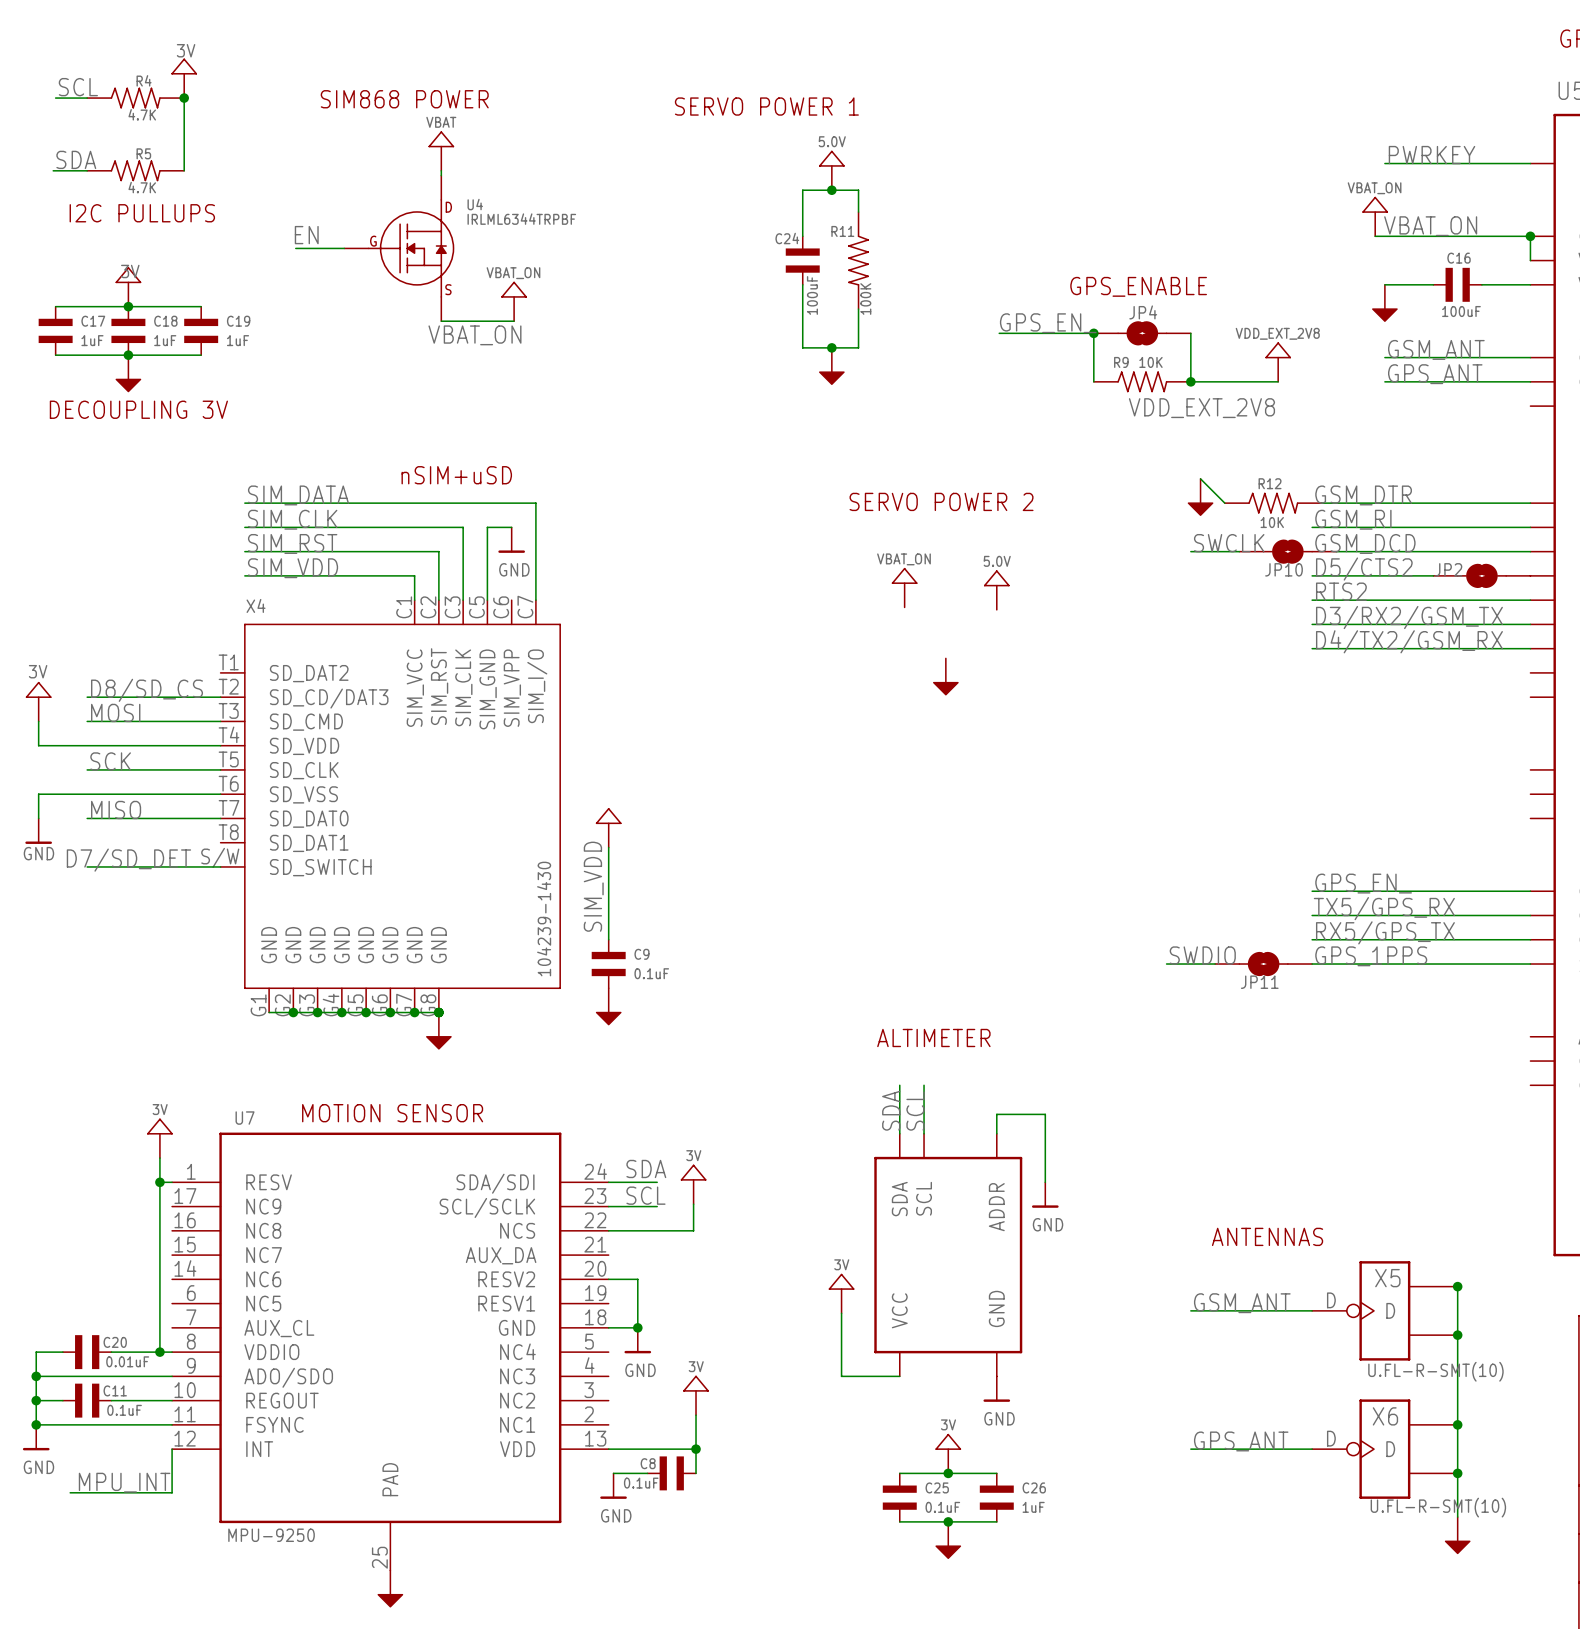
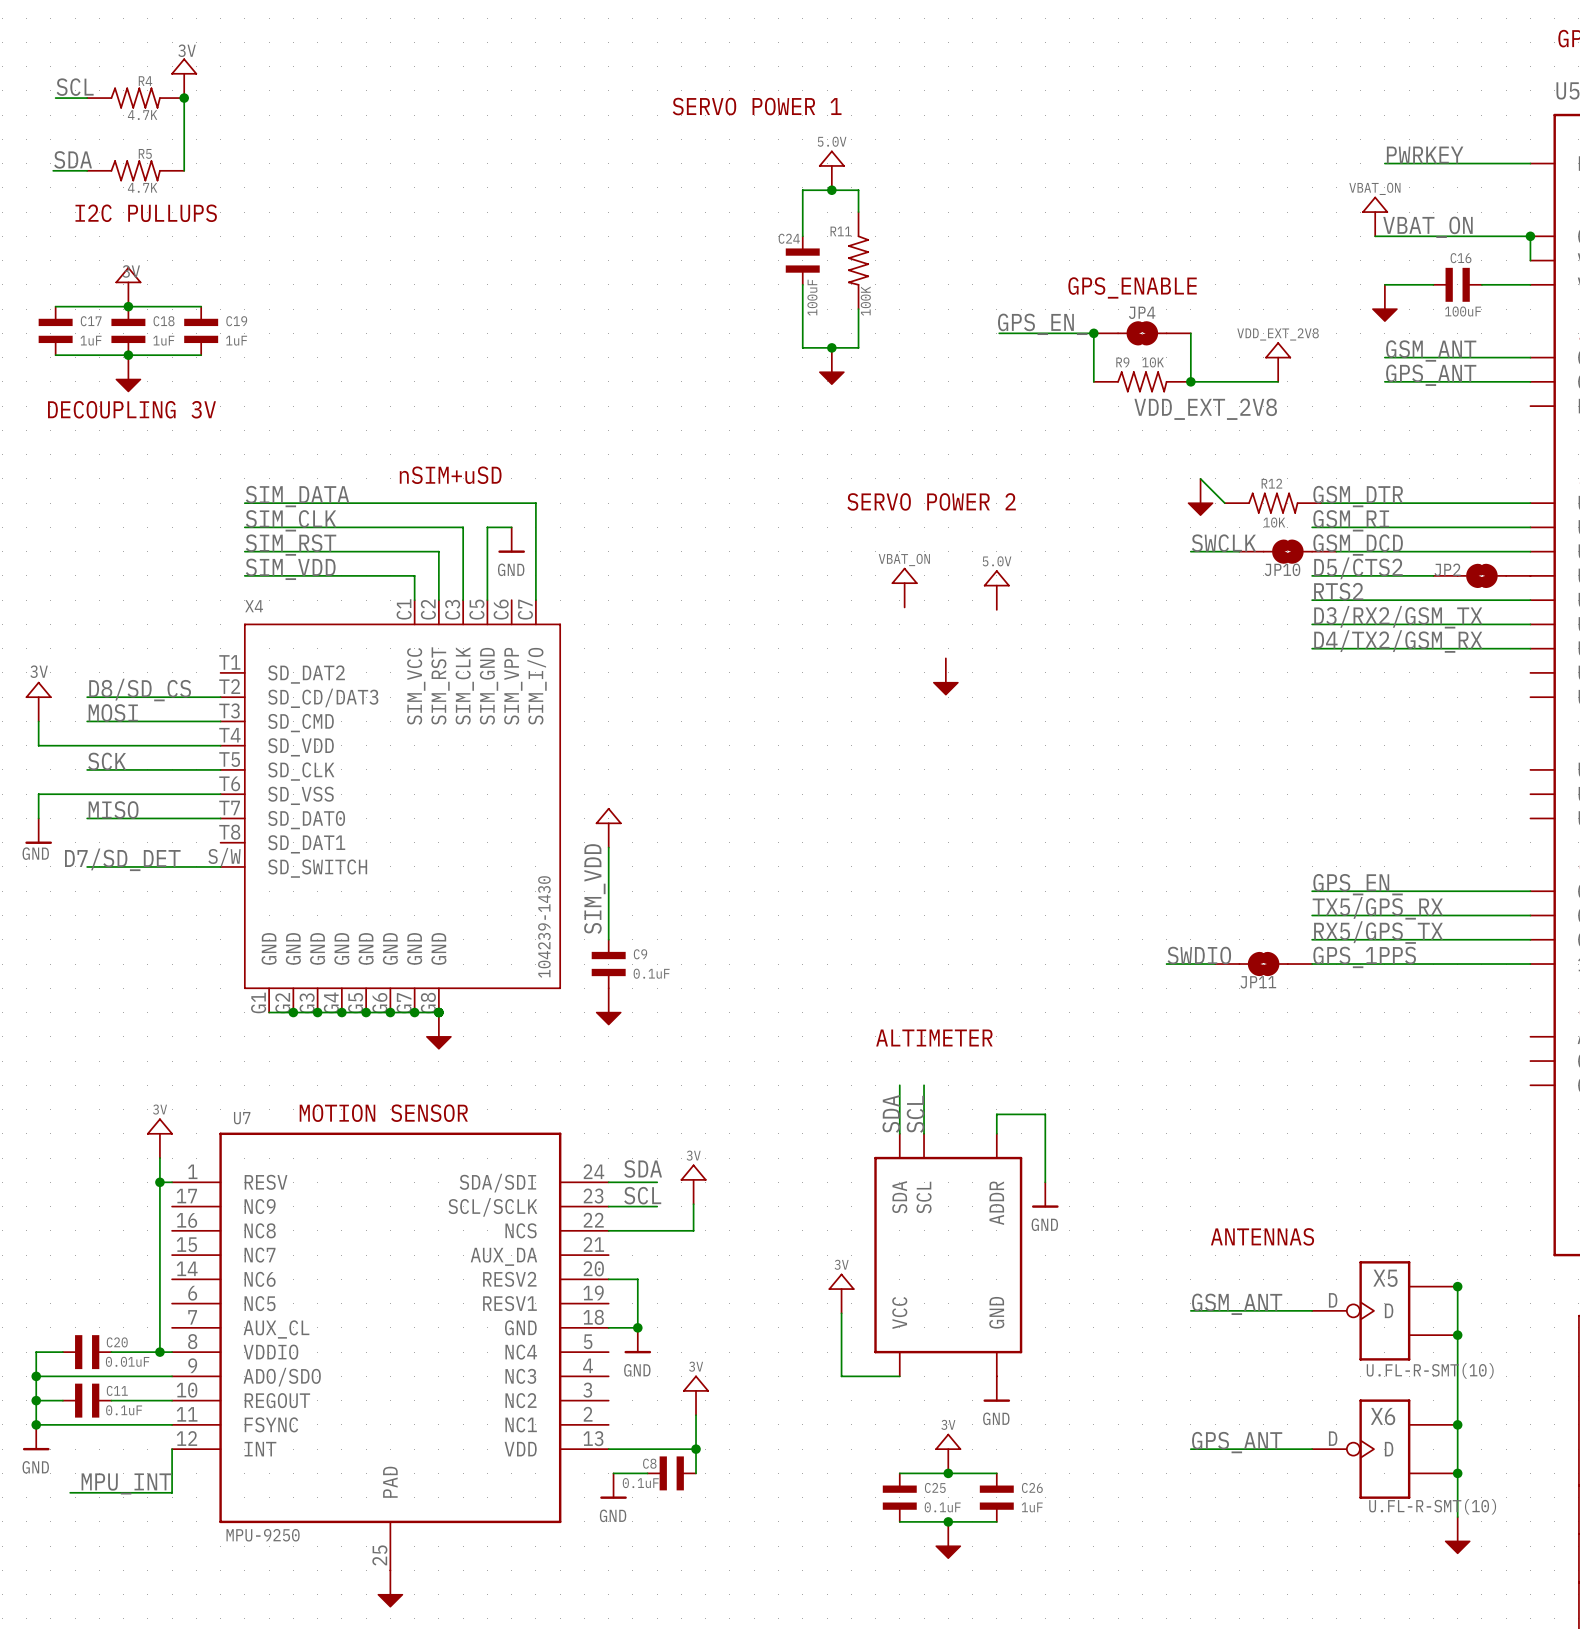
text: SIM868 POWER (404, 99) -> none
power symbol: VBAT (441, 151) -> none
wire: (441, 170) (441, 175) -> none
label: EN (306, 235) -> none
wire: (295, 248) (344, 248) -> none
U4: IRLML6344TRPBF (399, 248) -> none
power symbol: VBAT_ON (514, 301) -> none
wire: (441, 321) (514, 321) -> none
label: VBAT_ON (474, 335) -> none

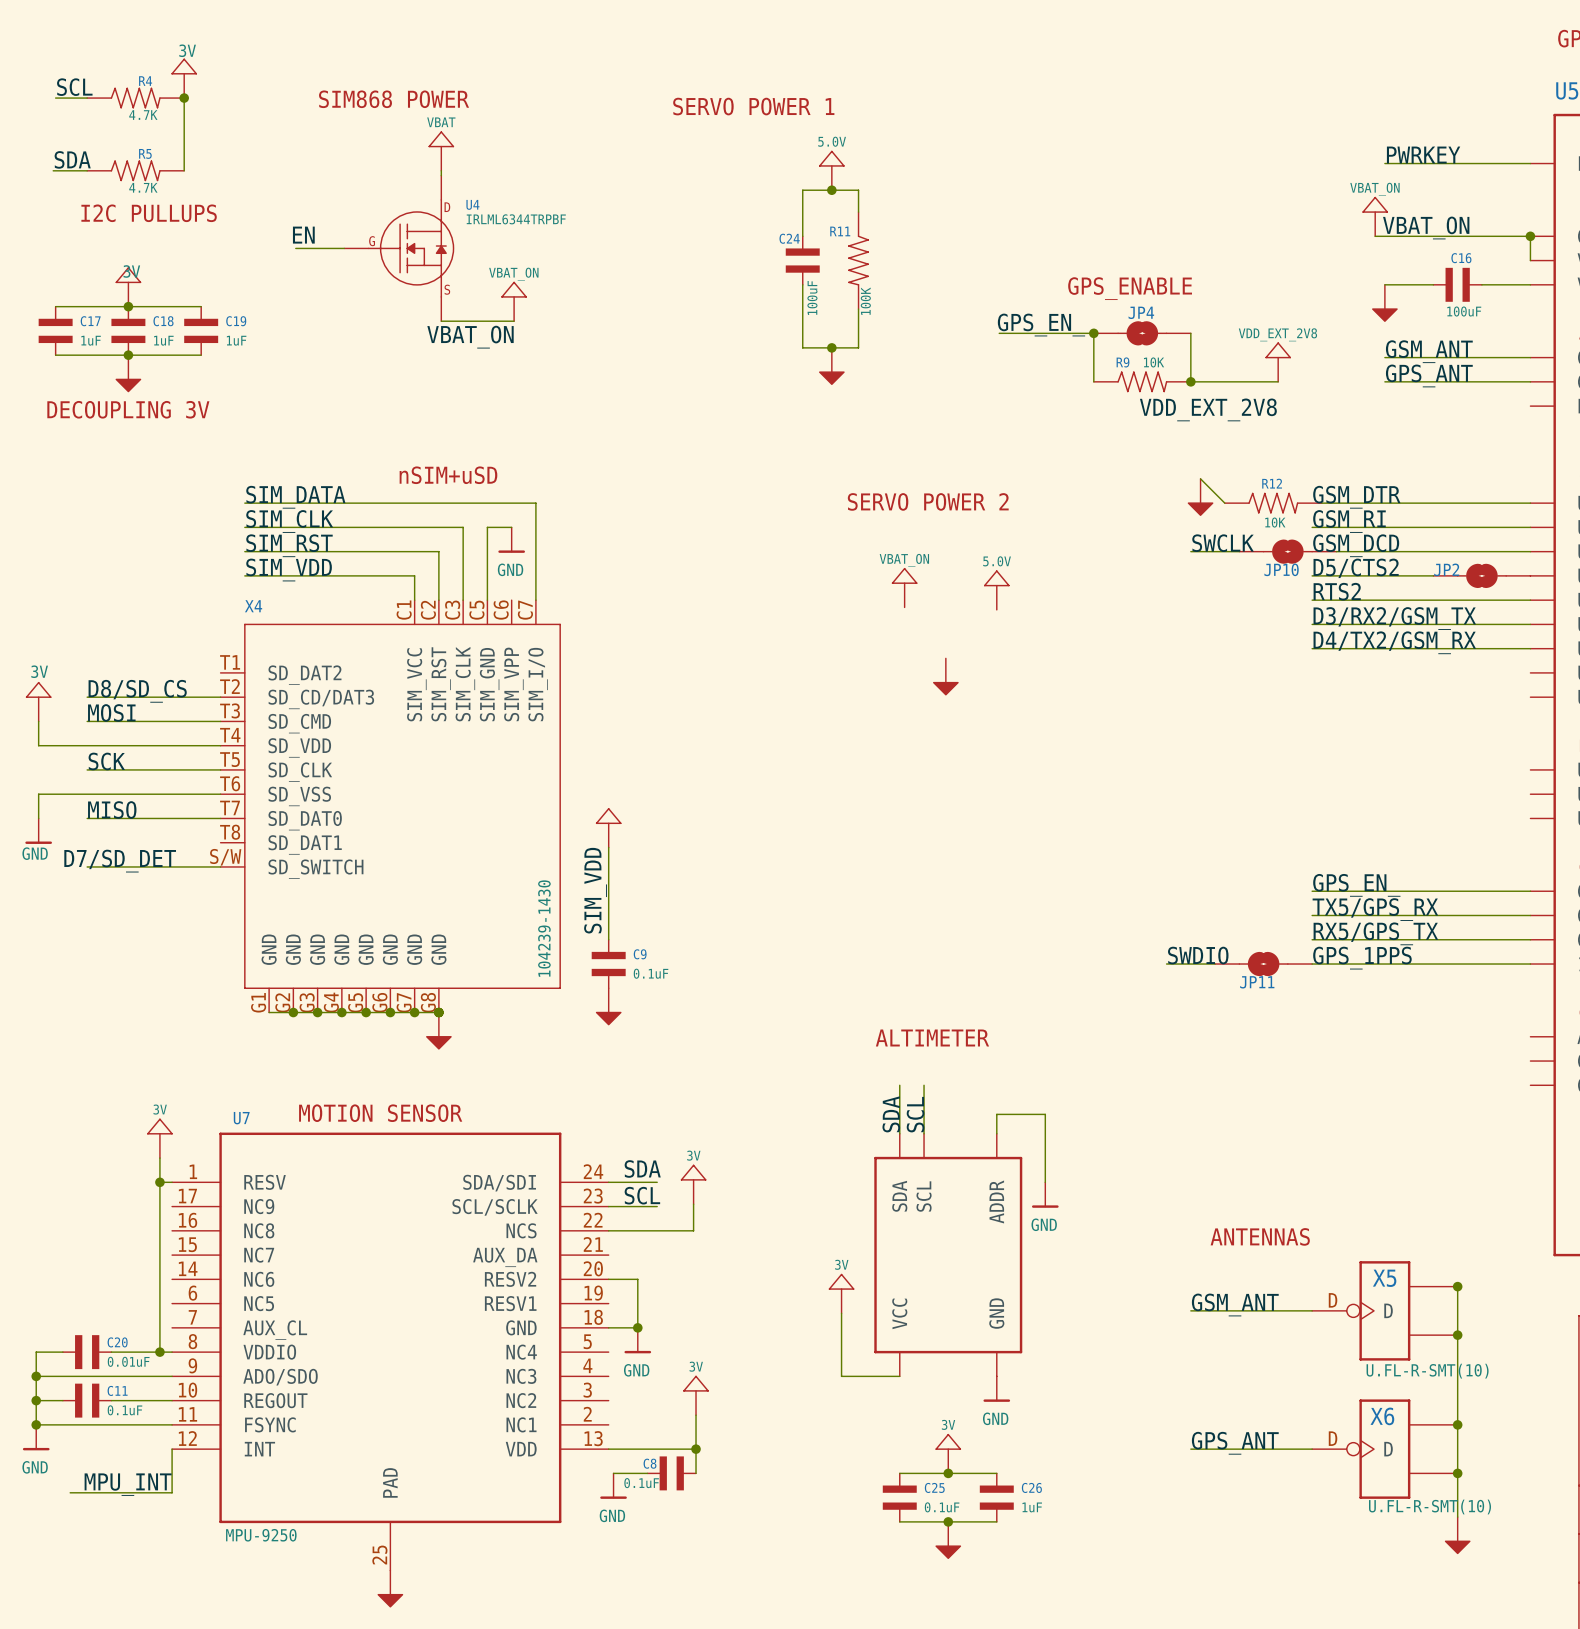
text: none -> SIM868 POWER (394, 99)
power symbol: none -> VBAT (441, 151)
wire: none -> (441, 170) (441, 175)
label: none -> EN (303, 235)
wire: none -> (295, 248) (344, 248)
U4: none -> IRLML6344TRPBF (399, 248)
power symbol: none -> VBAT_ON (514, 301)
wire: none -> (441, 321) (514, 321)
label: none -> VBAT_ON (470, 337)

